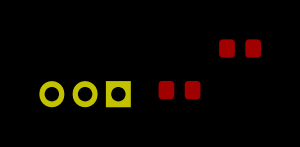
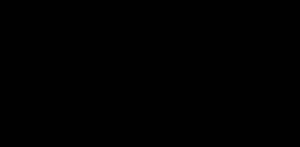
part: (240, 48) -> none
part: (179, 90) -> none
part: (85, 94) -> none

